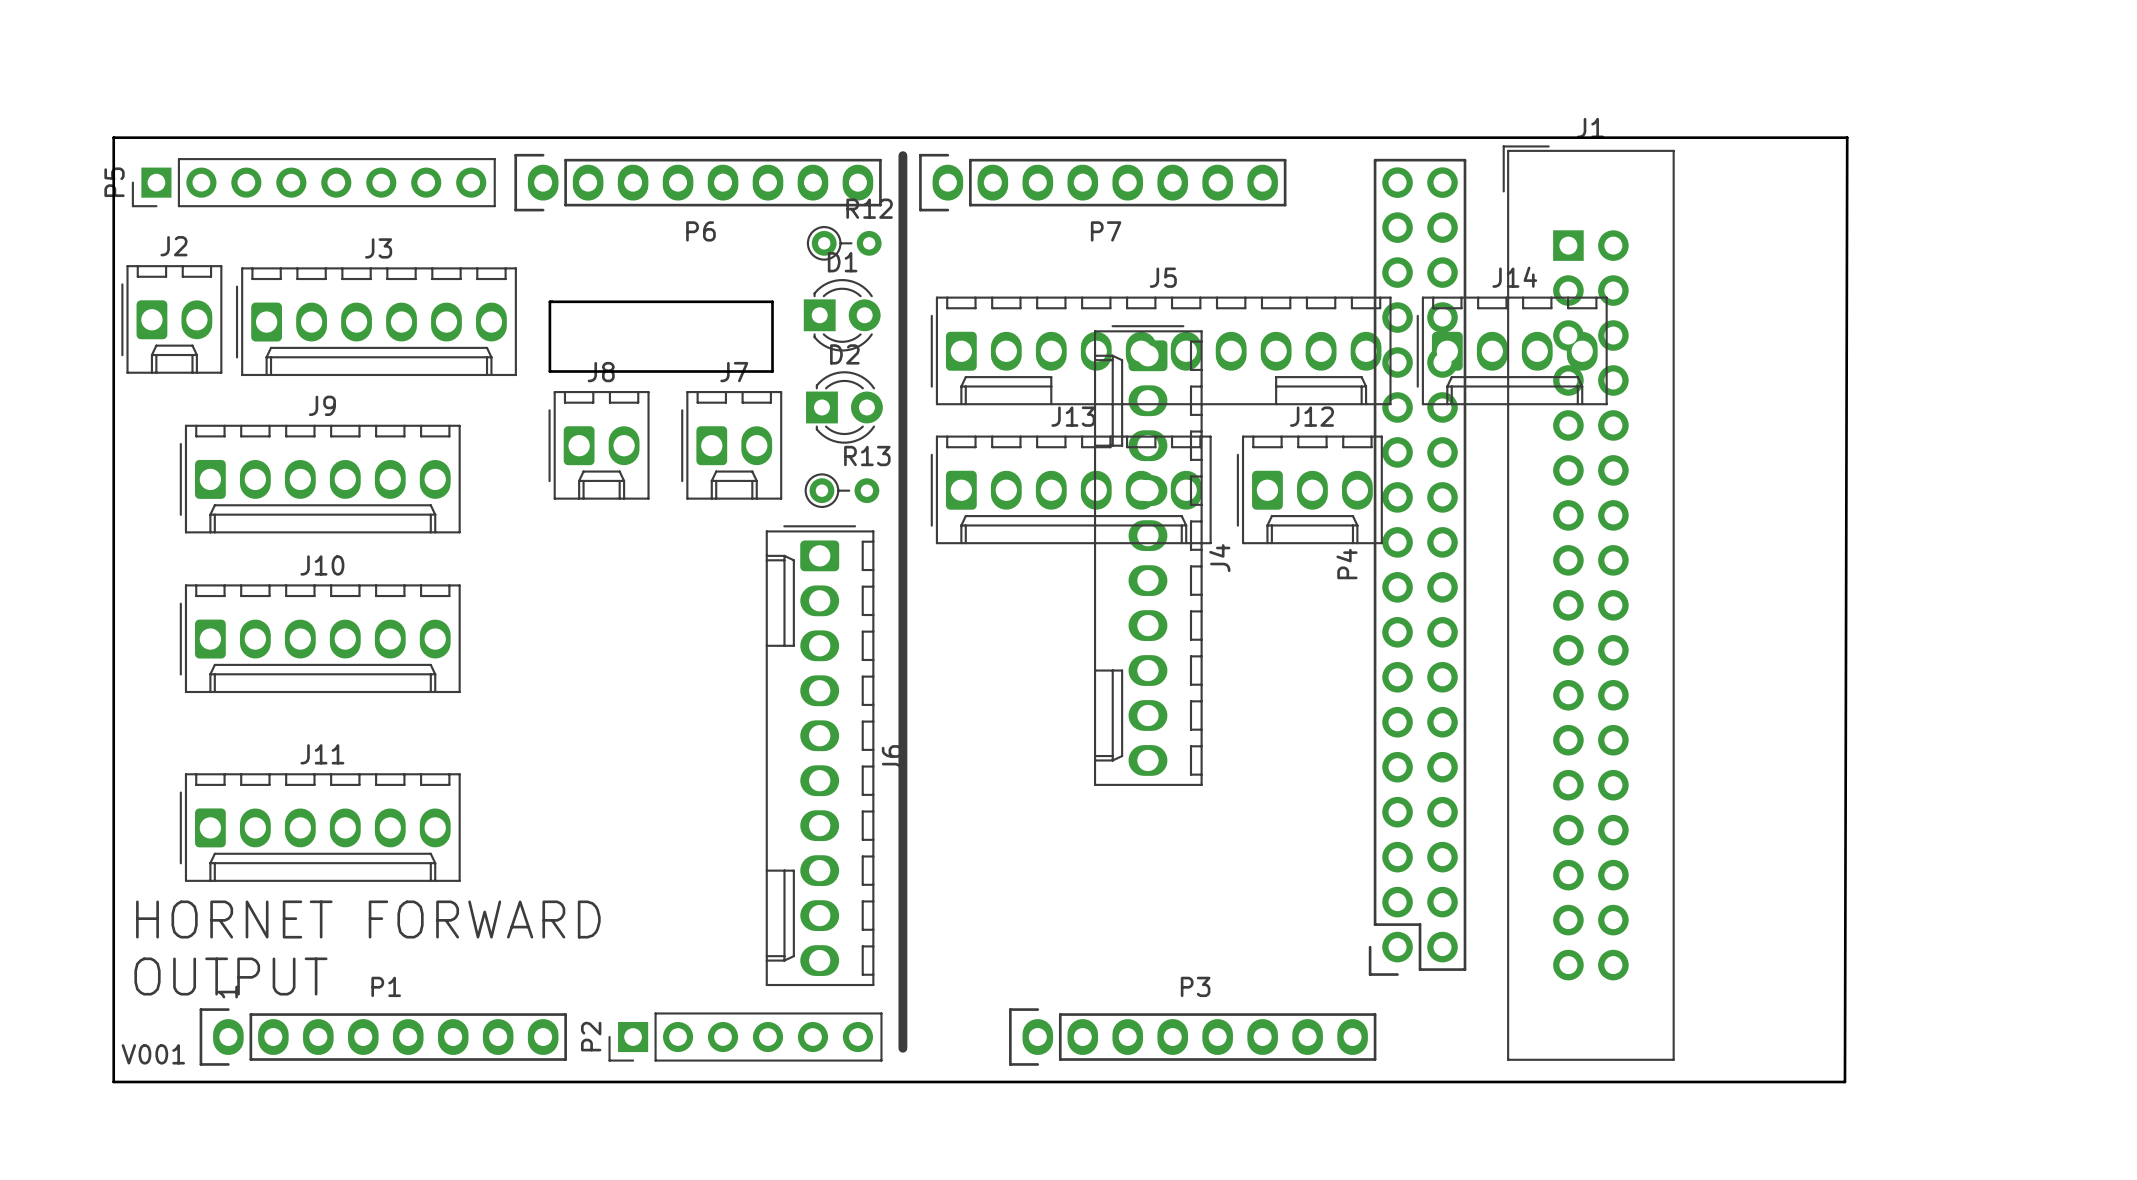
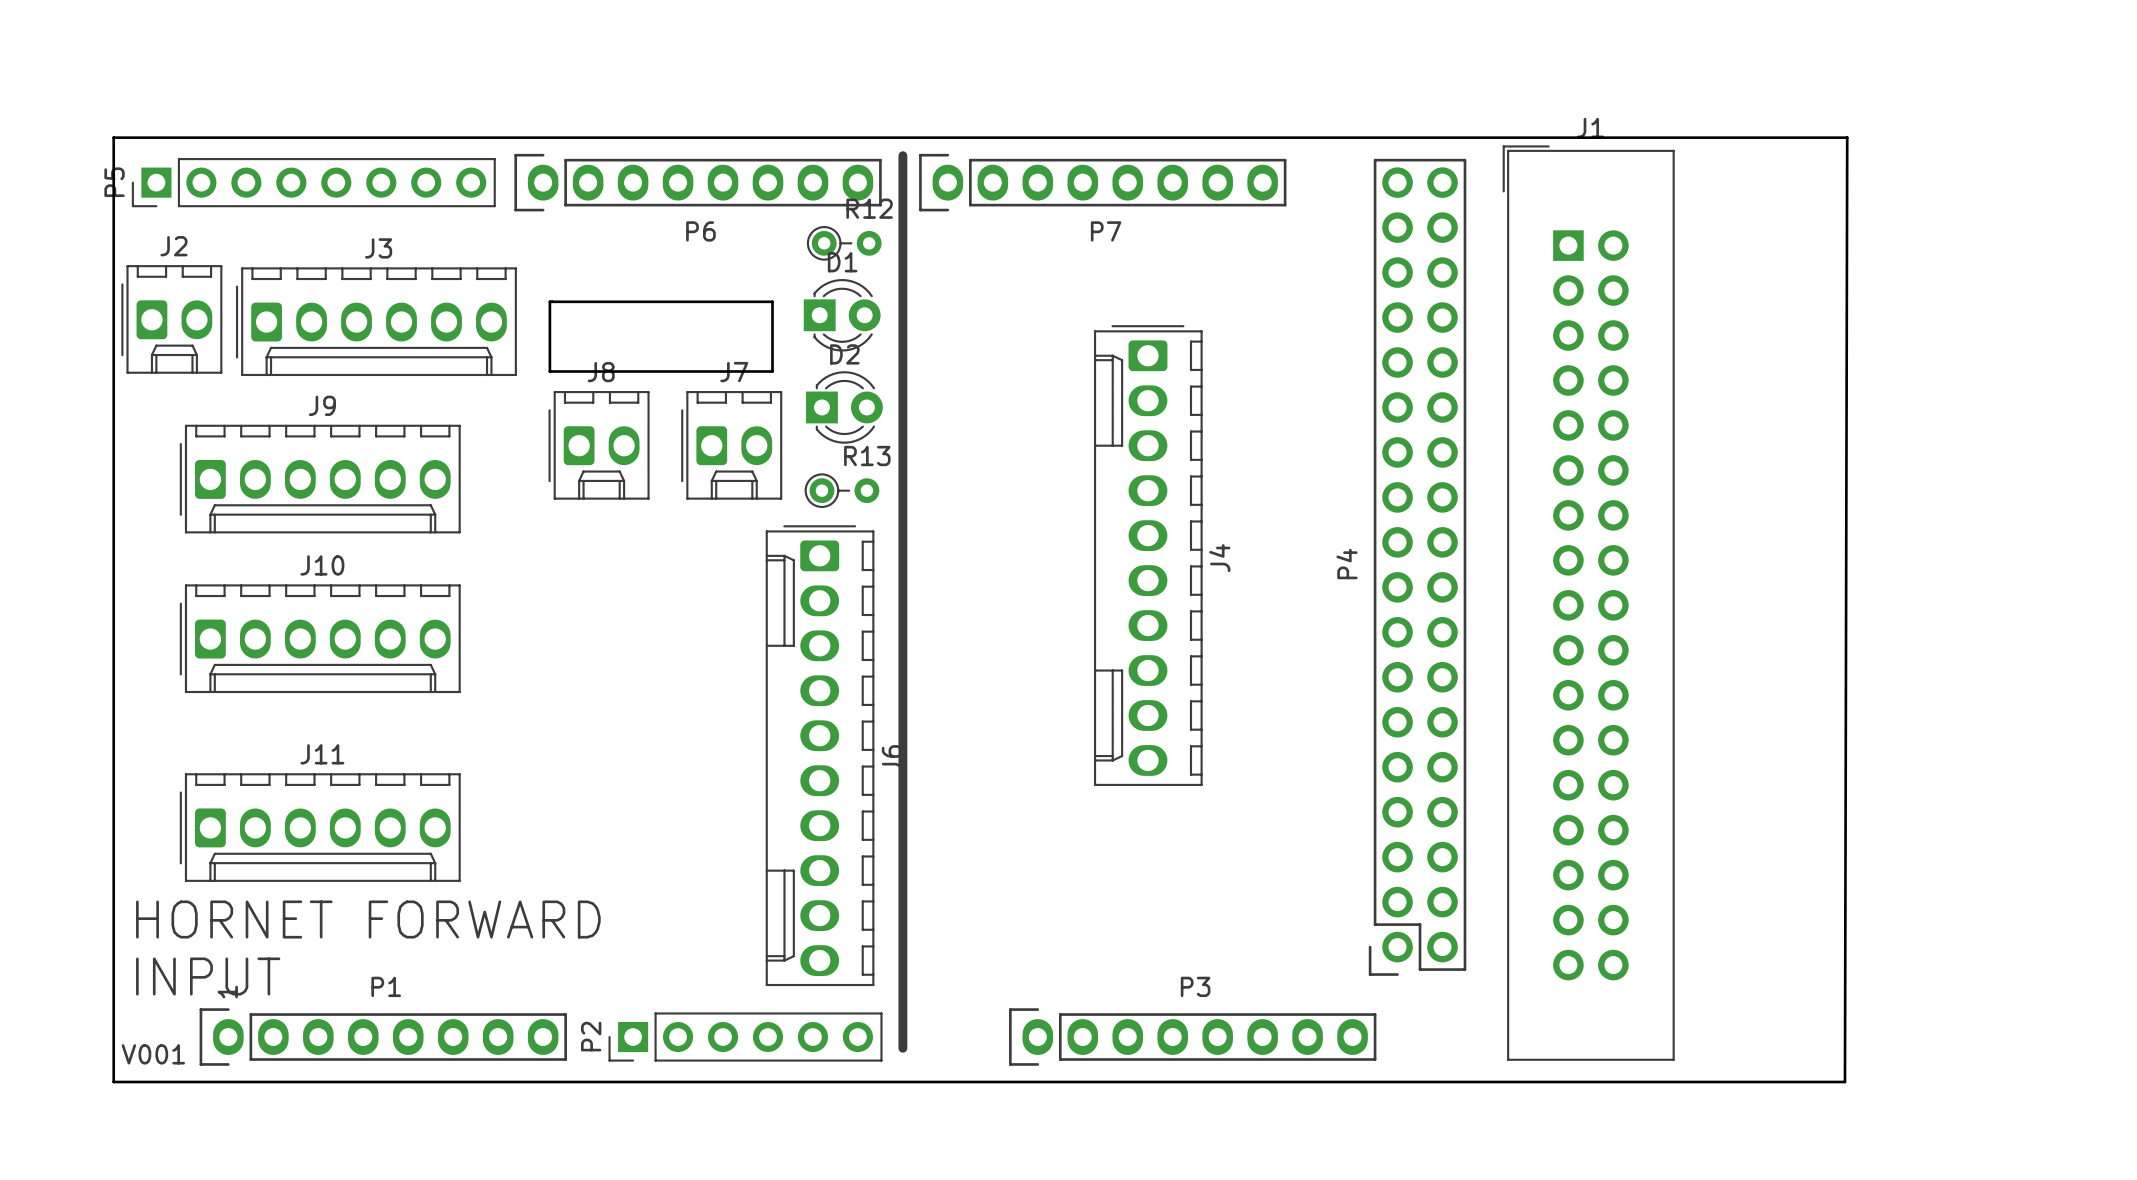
J5: (1161, 350) -> none
J14: (1512, 350) -> none
J13: (1071, 489) -> none
J12: (1309, 489) -> none
text: OUTPUT (230, 976) -> INPUT (208, 976)

